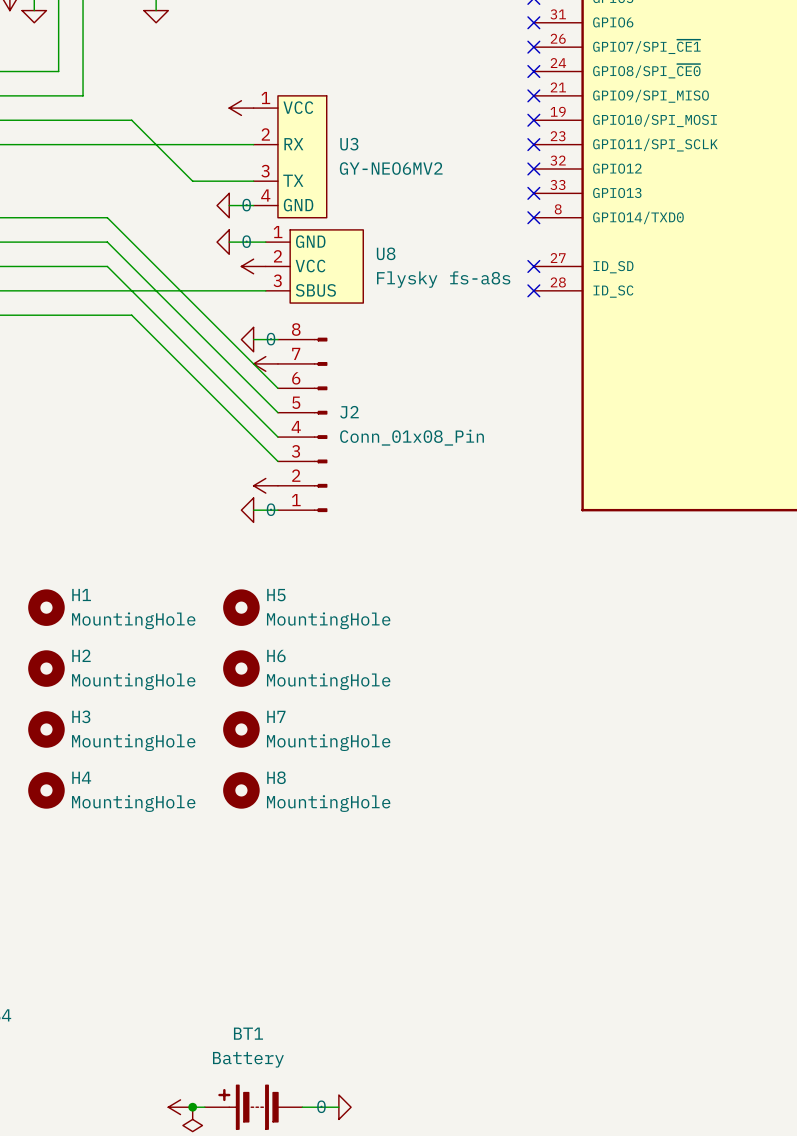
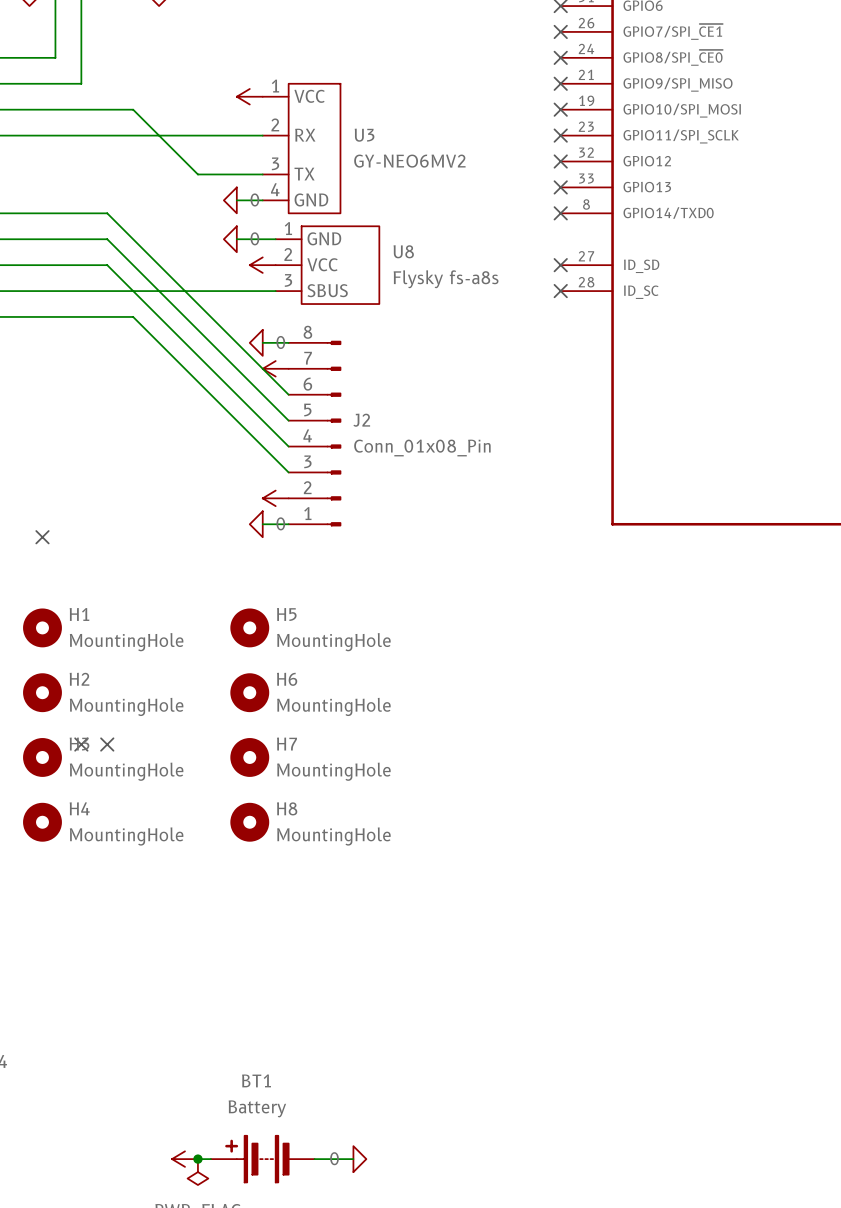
no-connect mark: none -> (42, 537)
no-connect mark: none -> (81, 744)
no-connect mark: none -> (107, 744)

